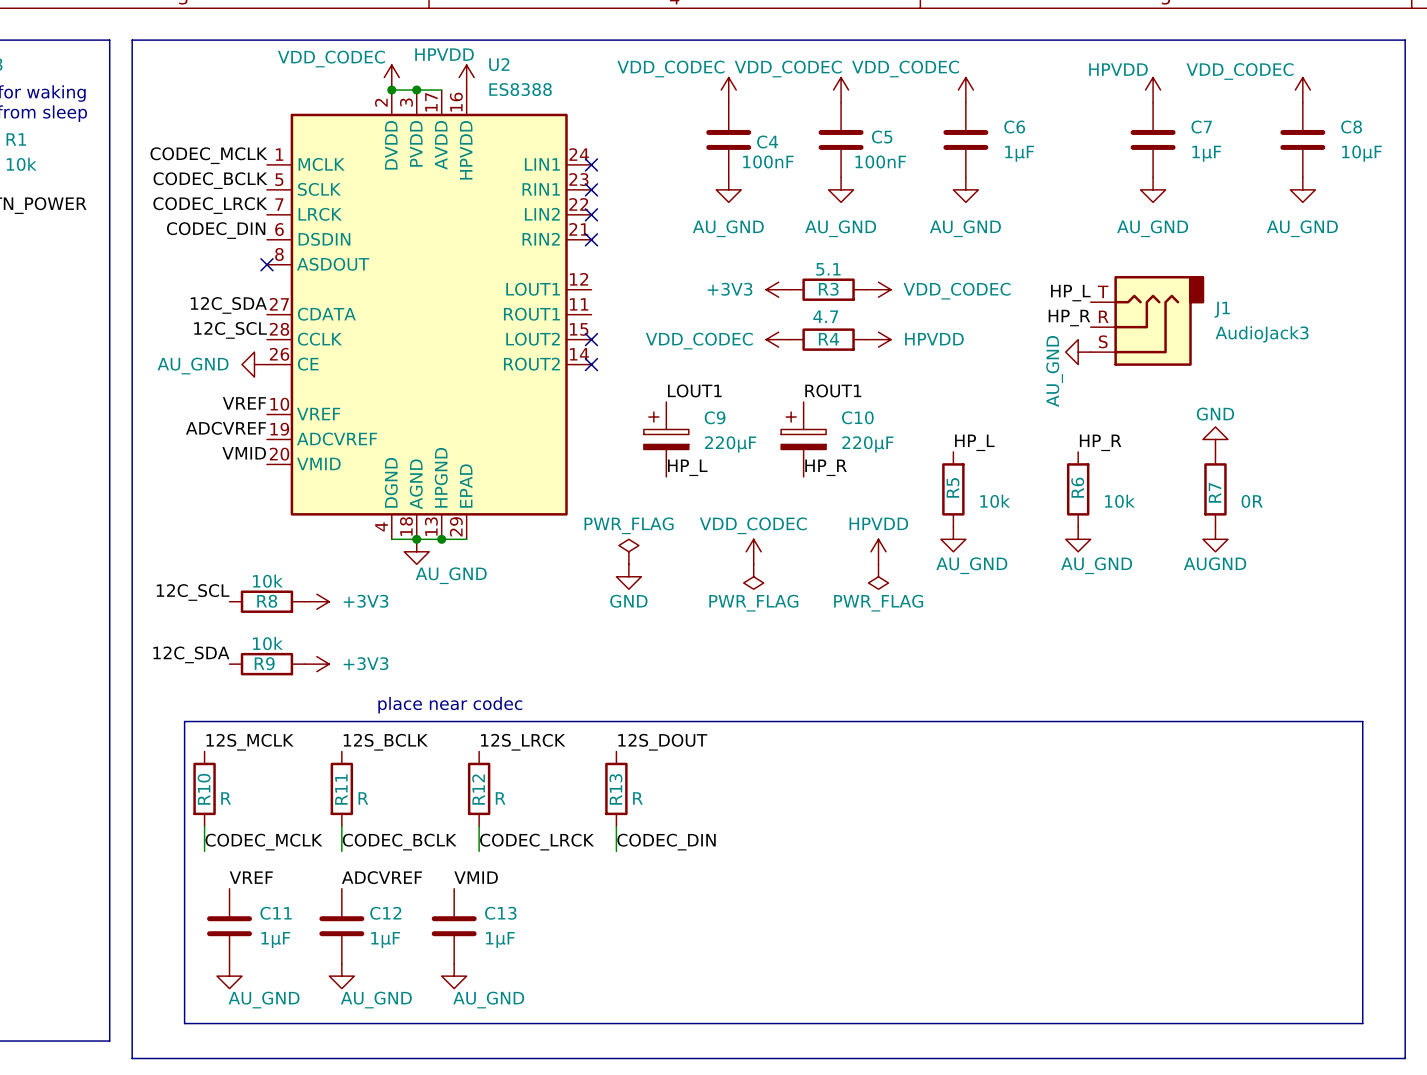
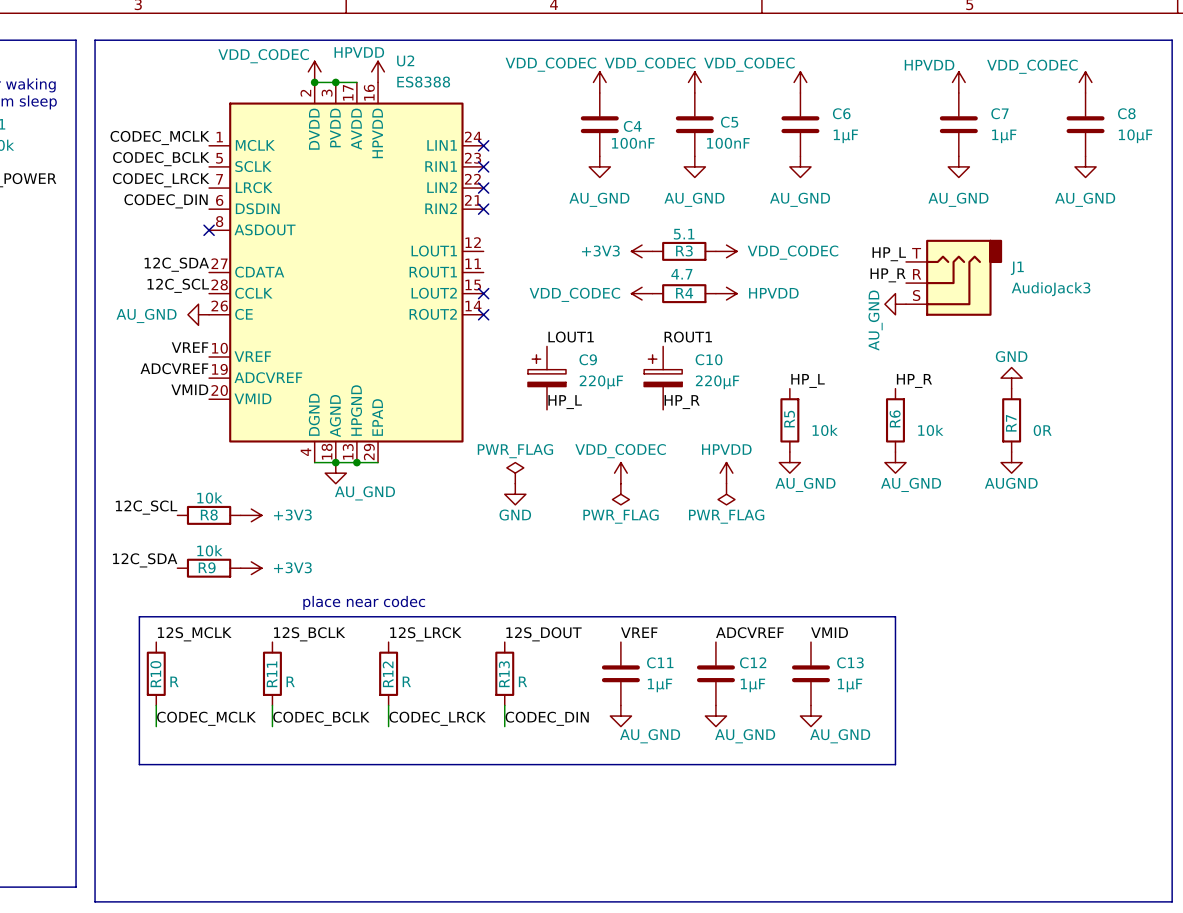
line: (1078, 721) (1362, 721) (1362, 1023) (184, 1023) (184, 896) -> (895, 616) (895, 764) (139, 764)
label: none -> VREF (639, 632)
label: none -> ADCVREF (749, 632)
label: none -> VMID (829, 632)
power symbol: none -> AU_GND (620, 716)
power symbol: none -> AU_GND (715, 716)
power symbol: none -> AU_GND (810, 716)
label: VREF (251, 877) -> none
label: ADCVREF (381, 877) -> none
label: VMID (476, 877) -> none
C11 position: (229, 926) -> (620, 673)
C12 position: (341, 926) -> (715, 673)
C13 position: (454, 926) -> (810, 673)
power symbol: AU_GND (229, 976) -> none
power symbol: AU_GND (341, 976) -> none
power symbol: AU_GND (454, 976) -> none

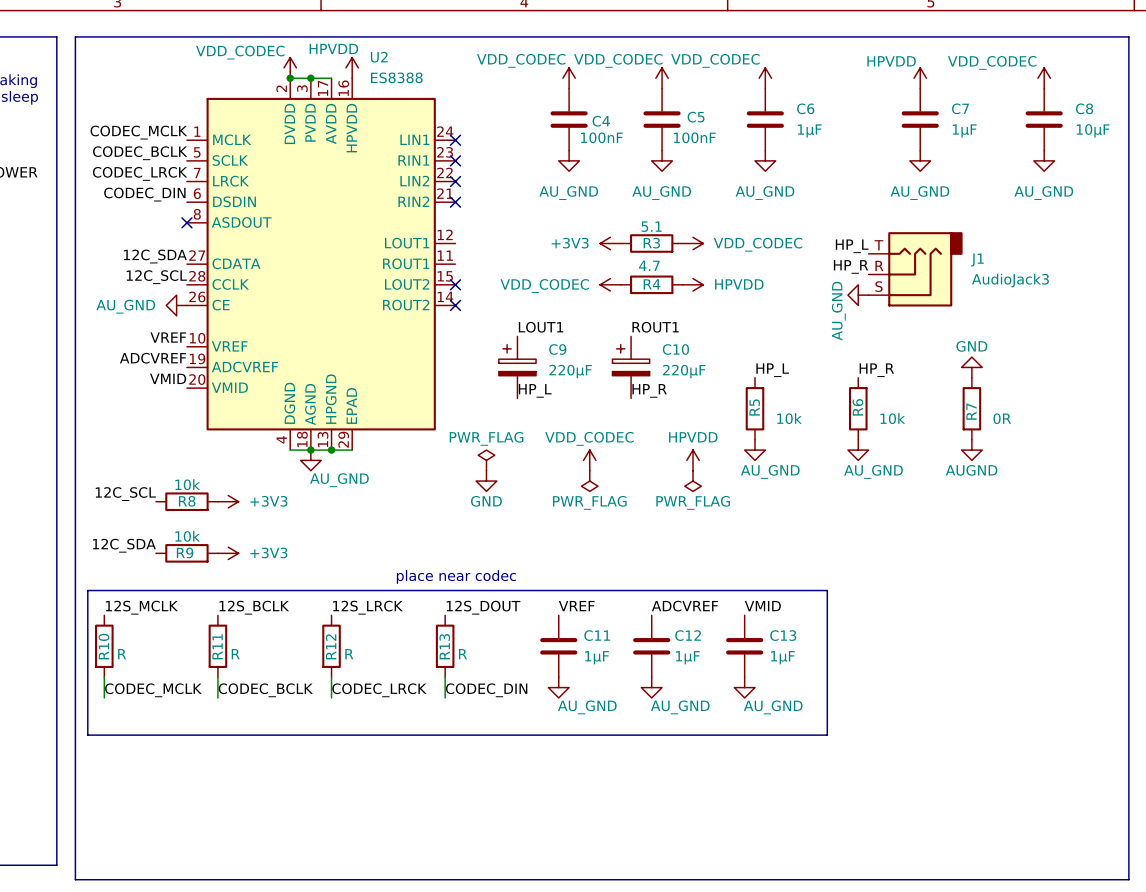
text position: place near codec (364, 602) -> place near codec (456, 576)
line: (139, 616) (895, 616) (895, 764) (139, 764) (139, 616) -> (87, 590) (827, 590) (827, 735) (87, 735) (87, 590)
label position: VREF (639, 632) -> VREF (576, 606)
label position: ADCVREF (749, 632) -> ADCVREF (684, 606)
label position: VMID (829, 632) -> VMID (762, 606)
label position: 12S_MCLK (194, 634) -> 12S_MCLK (141, 607)
label position: 12S_BCLK (309, 634) -> 12S_BCLK (254, 607)
label position: 12S_LRCK (425, 634) -> 12S_LRCK (367, 607)
label position: 12S_DOUT (544, 634) -> 12S_DOUT (483, 607)
R10 position: (156, 673) -> (104, 646)
R11 position: (272, 673) -> (217, 646)
R12 position: (388, 673) -> (331, 646)
R13 position: (504, 673) -> (445, 646)
C11 position: (620, 673) -> (558, 646)
C12 position: (715, 673) -> (651, 646)
C13 position: (810, 673) -> (744, 646)
wire: (156, 705) (156, 726) -> (104, 677) (104, 697)
wire: (272, 705) (272, 726) -> (217, 677) (217, 697)
wire: (388, 705) (388, 726) -> (331, 677) (331, 697)
wire: (504, 705) (504, 726) -> (445, 677) (445, 697)
power symbol: none -> AU_GND (558, 687)
power symbol: none -> AU_GND (651, 687)
power symbol: none -> AU_GND (744, 687)
power symbol: AU_GND (620, 716) -> none
power symbol: AU_GND (715, 716) -> none
power symbol: AU_GND (810, 716) -> none
label position: CODEC_MCLK (206, 718) -> CODEC_MCLK (153, 690)
label position: CODEC_BCLK (321, 718) -> CODEC_BCLK (265, 690)
label position: CODEC_LRCK (437, 718) -> CODEC_LRCK (379, 690)
label position: CODEC_DIN (547, 718) -> CODEC_DIN (486, 690)

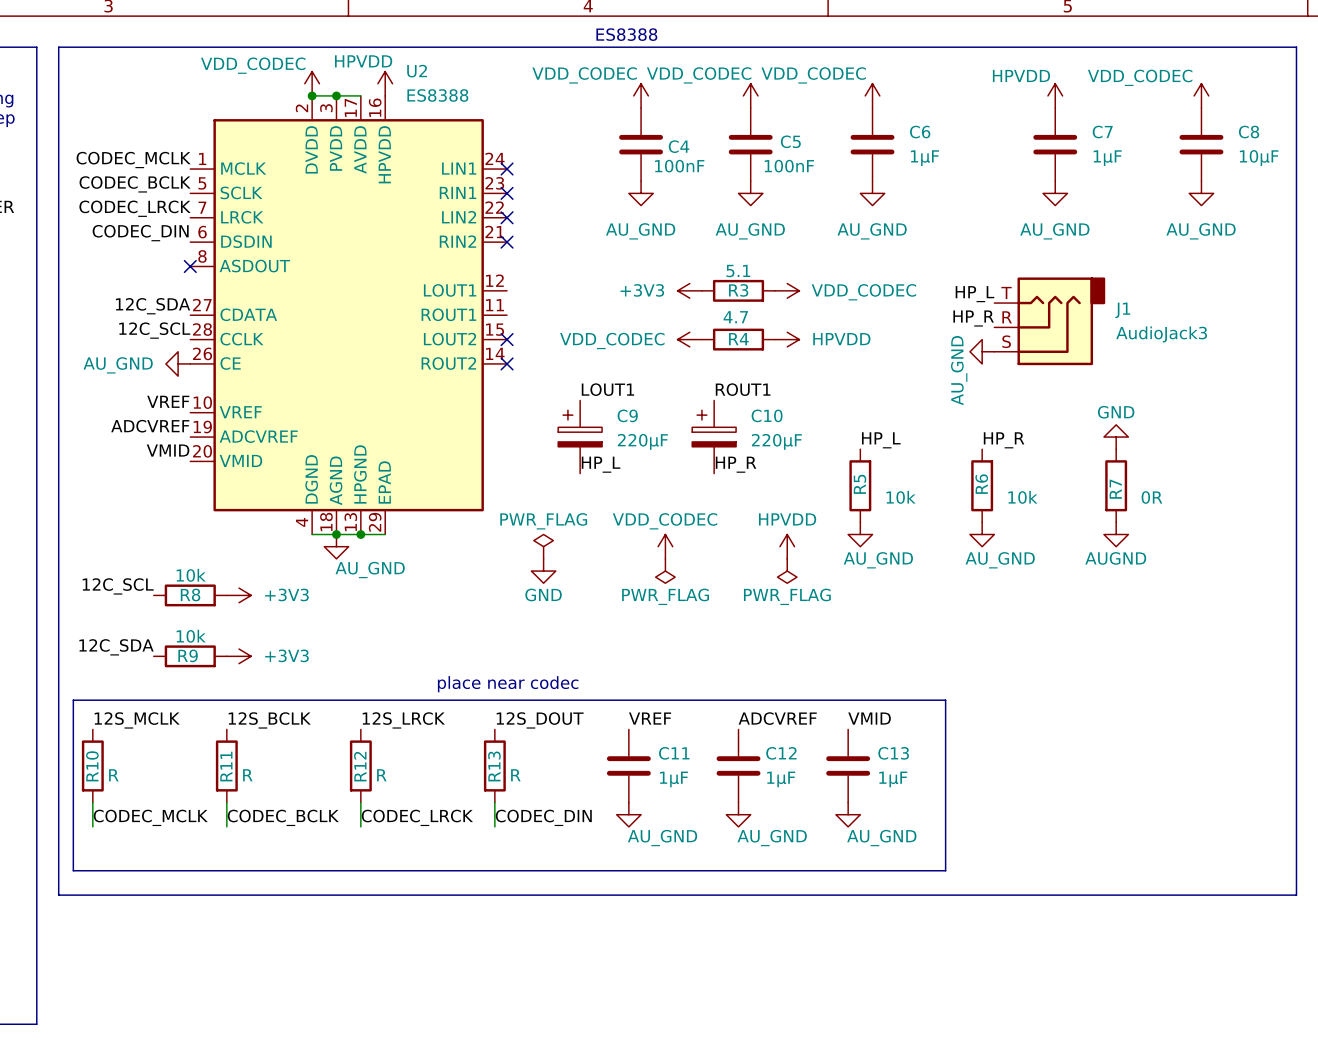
text: none -> ES8388 (626, 34)
line: (1124, 36) (1128, 36) (1128, 879) (75, 879) (75, 755) -> (1296, 47) (1296, 895) (58, 895)

